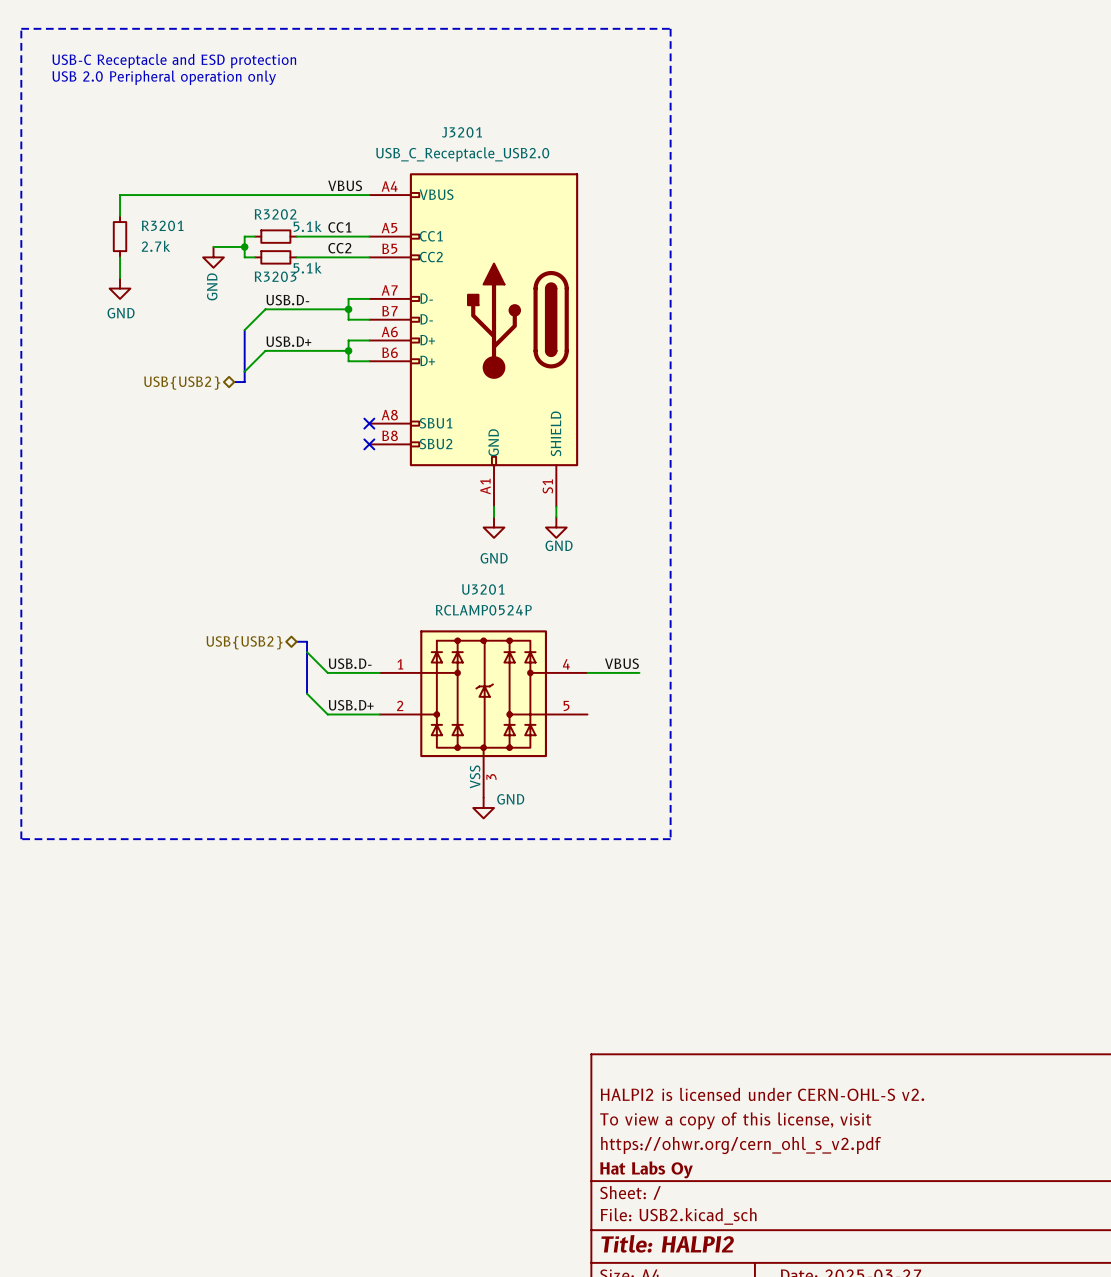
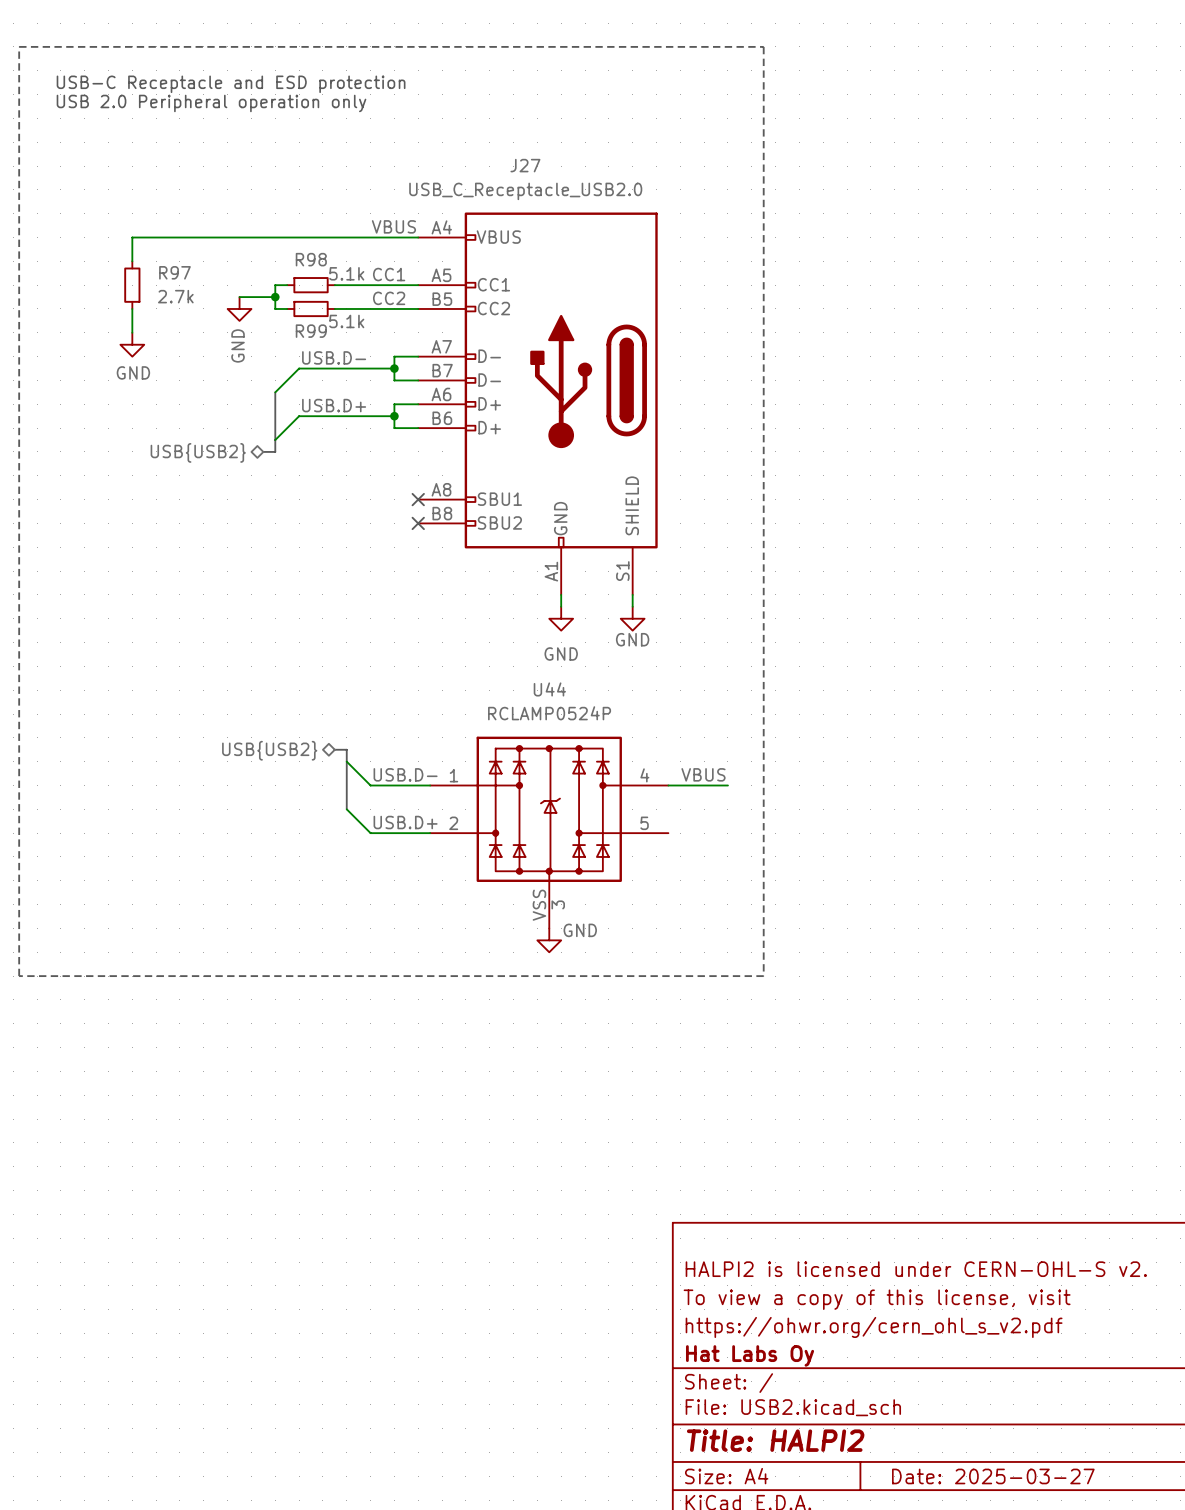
J3201 name: J3201 (461, 132) -> J27 (525, 165)
R3202 name: R3202 (275, 214) -> R98 (311, 259)
R3201 name: R3201 (162, 225) -> R97 (174, 272)
R3203 name: R3203 (275, 276) -> R99 (311, 331)
U3201 name: U3201 (483, 589) -> U44 (549, 689)

